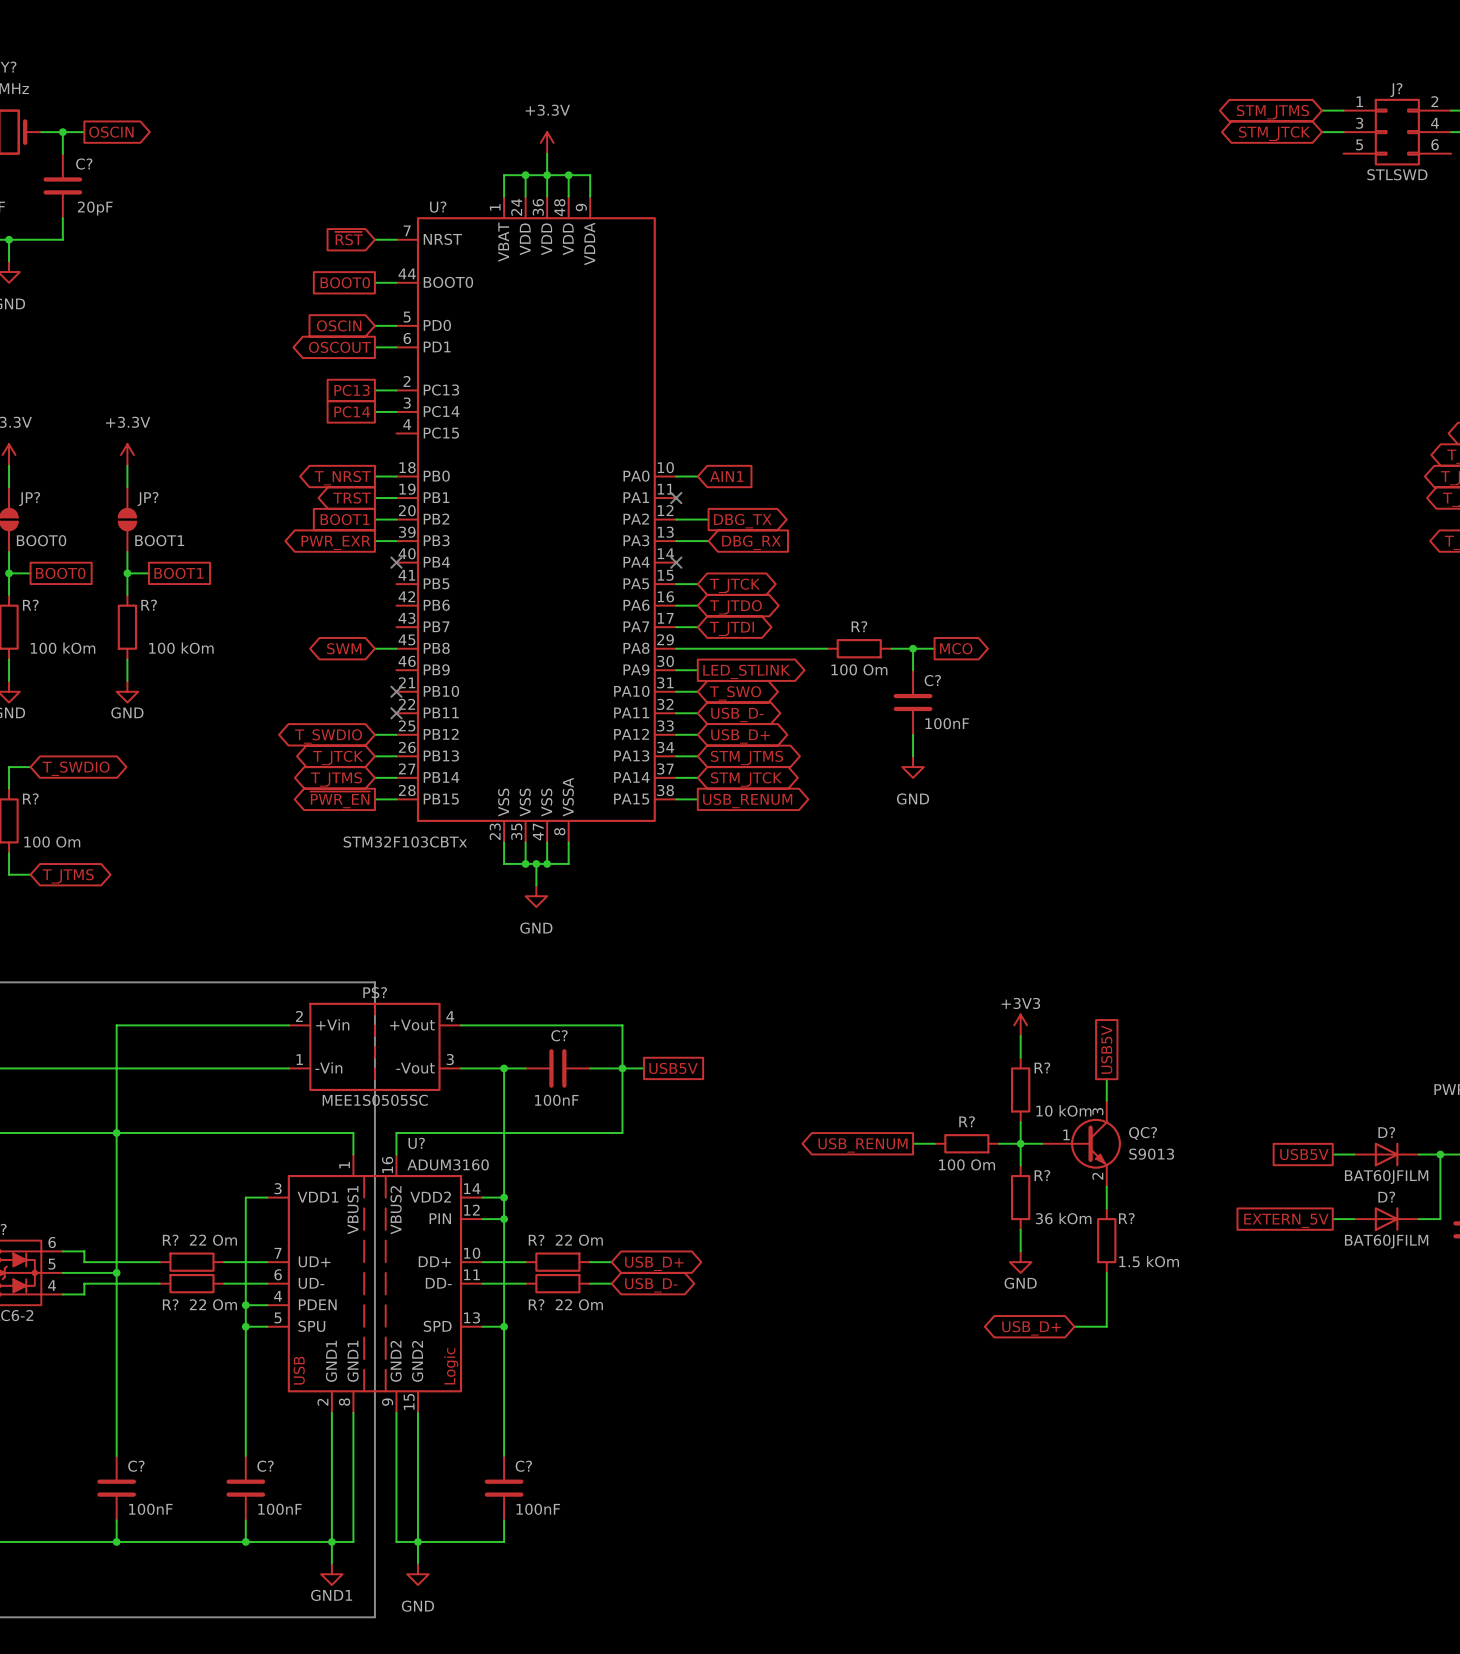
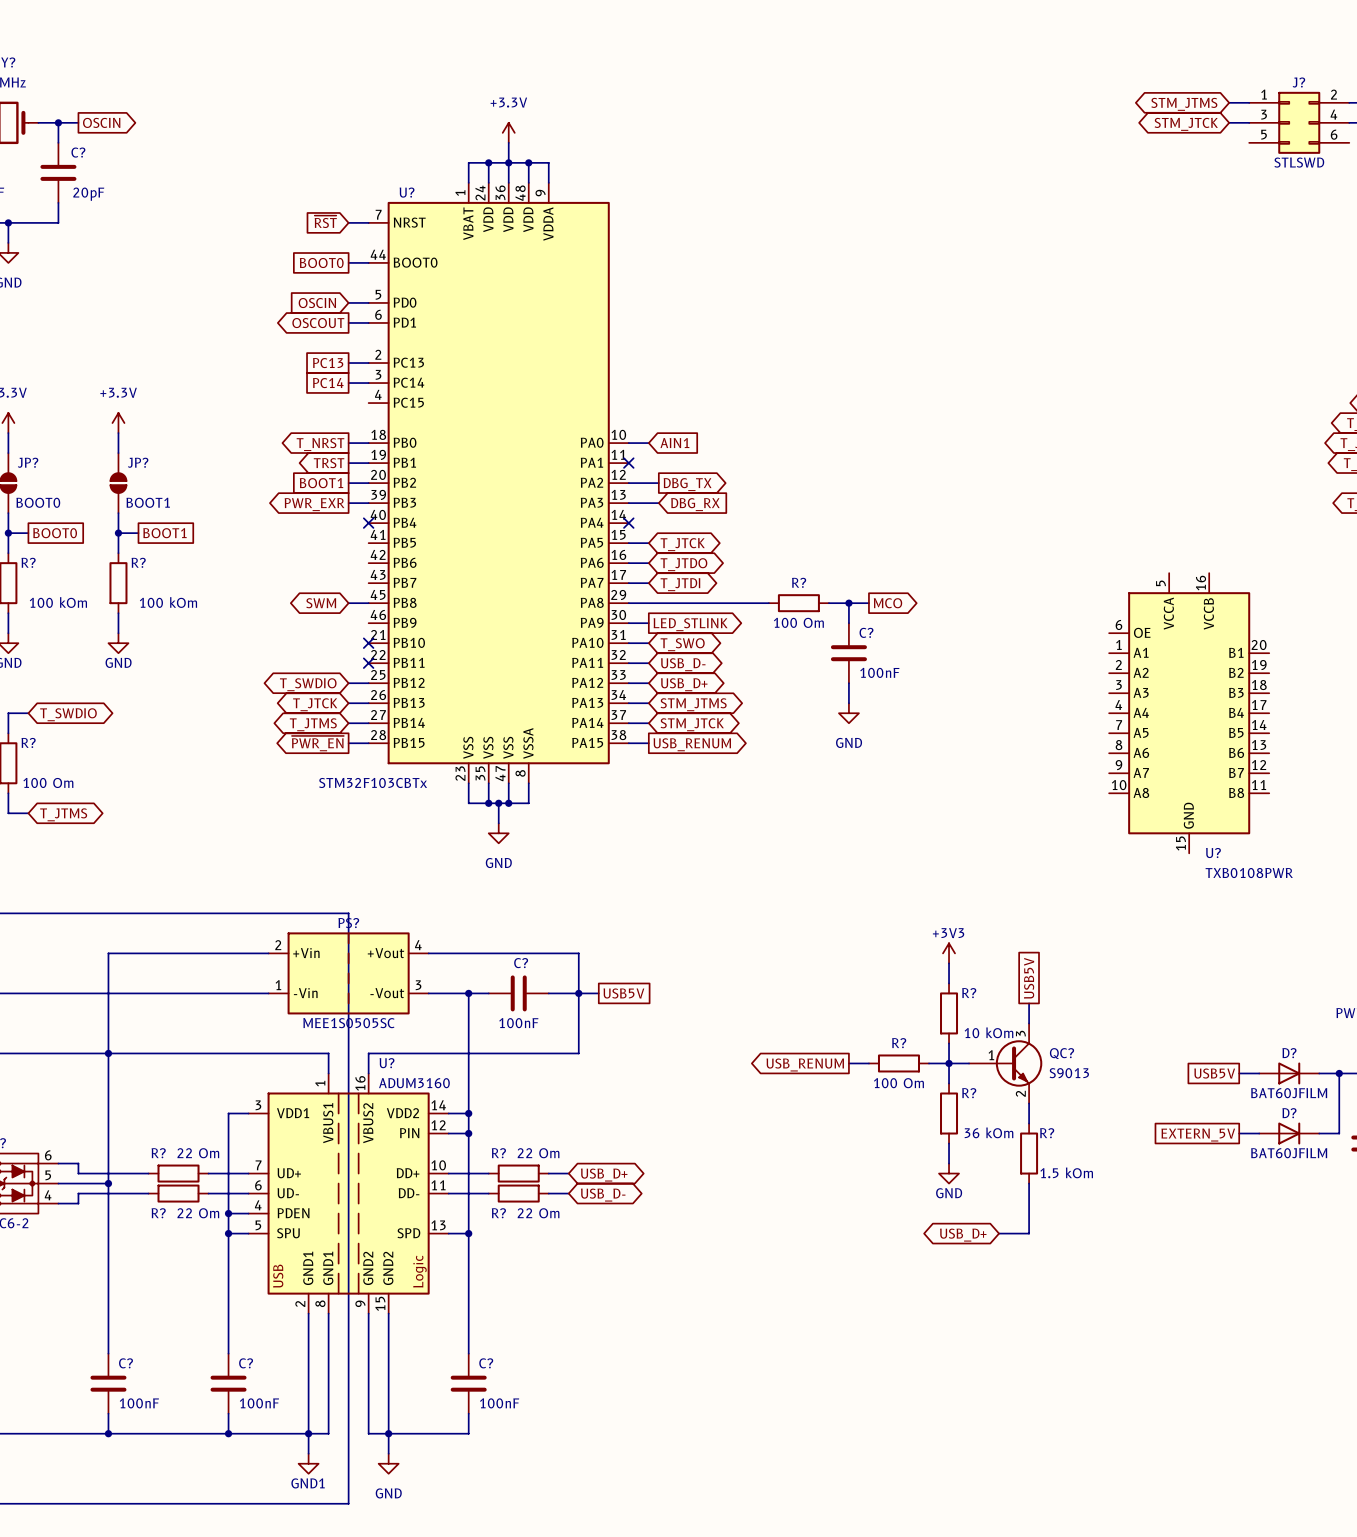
U?: none -> TXB0108PWR (1189, 713)

